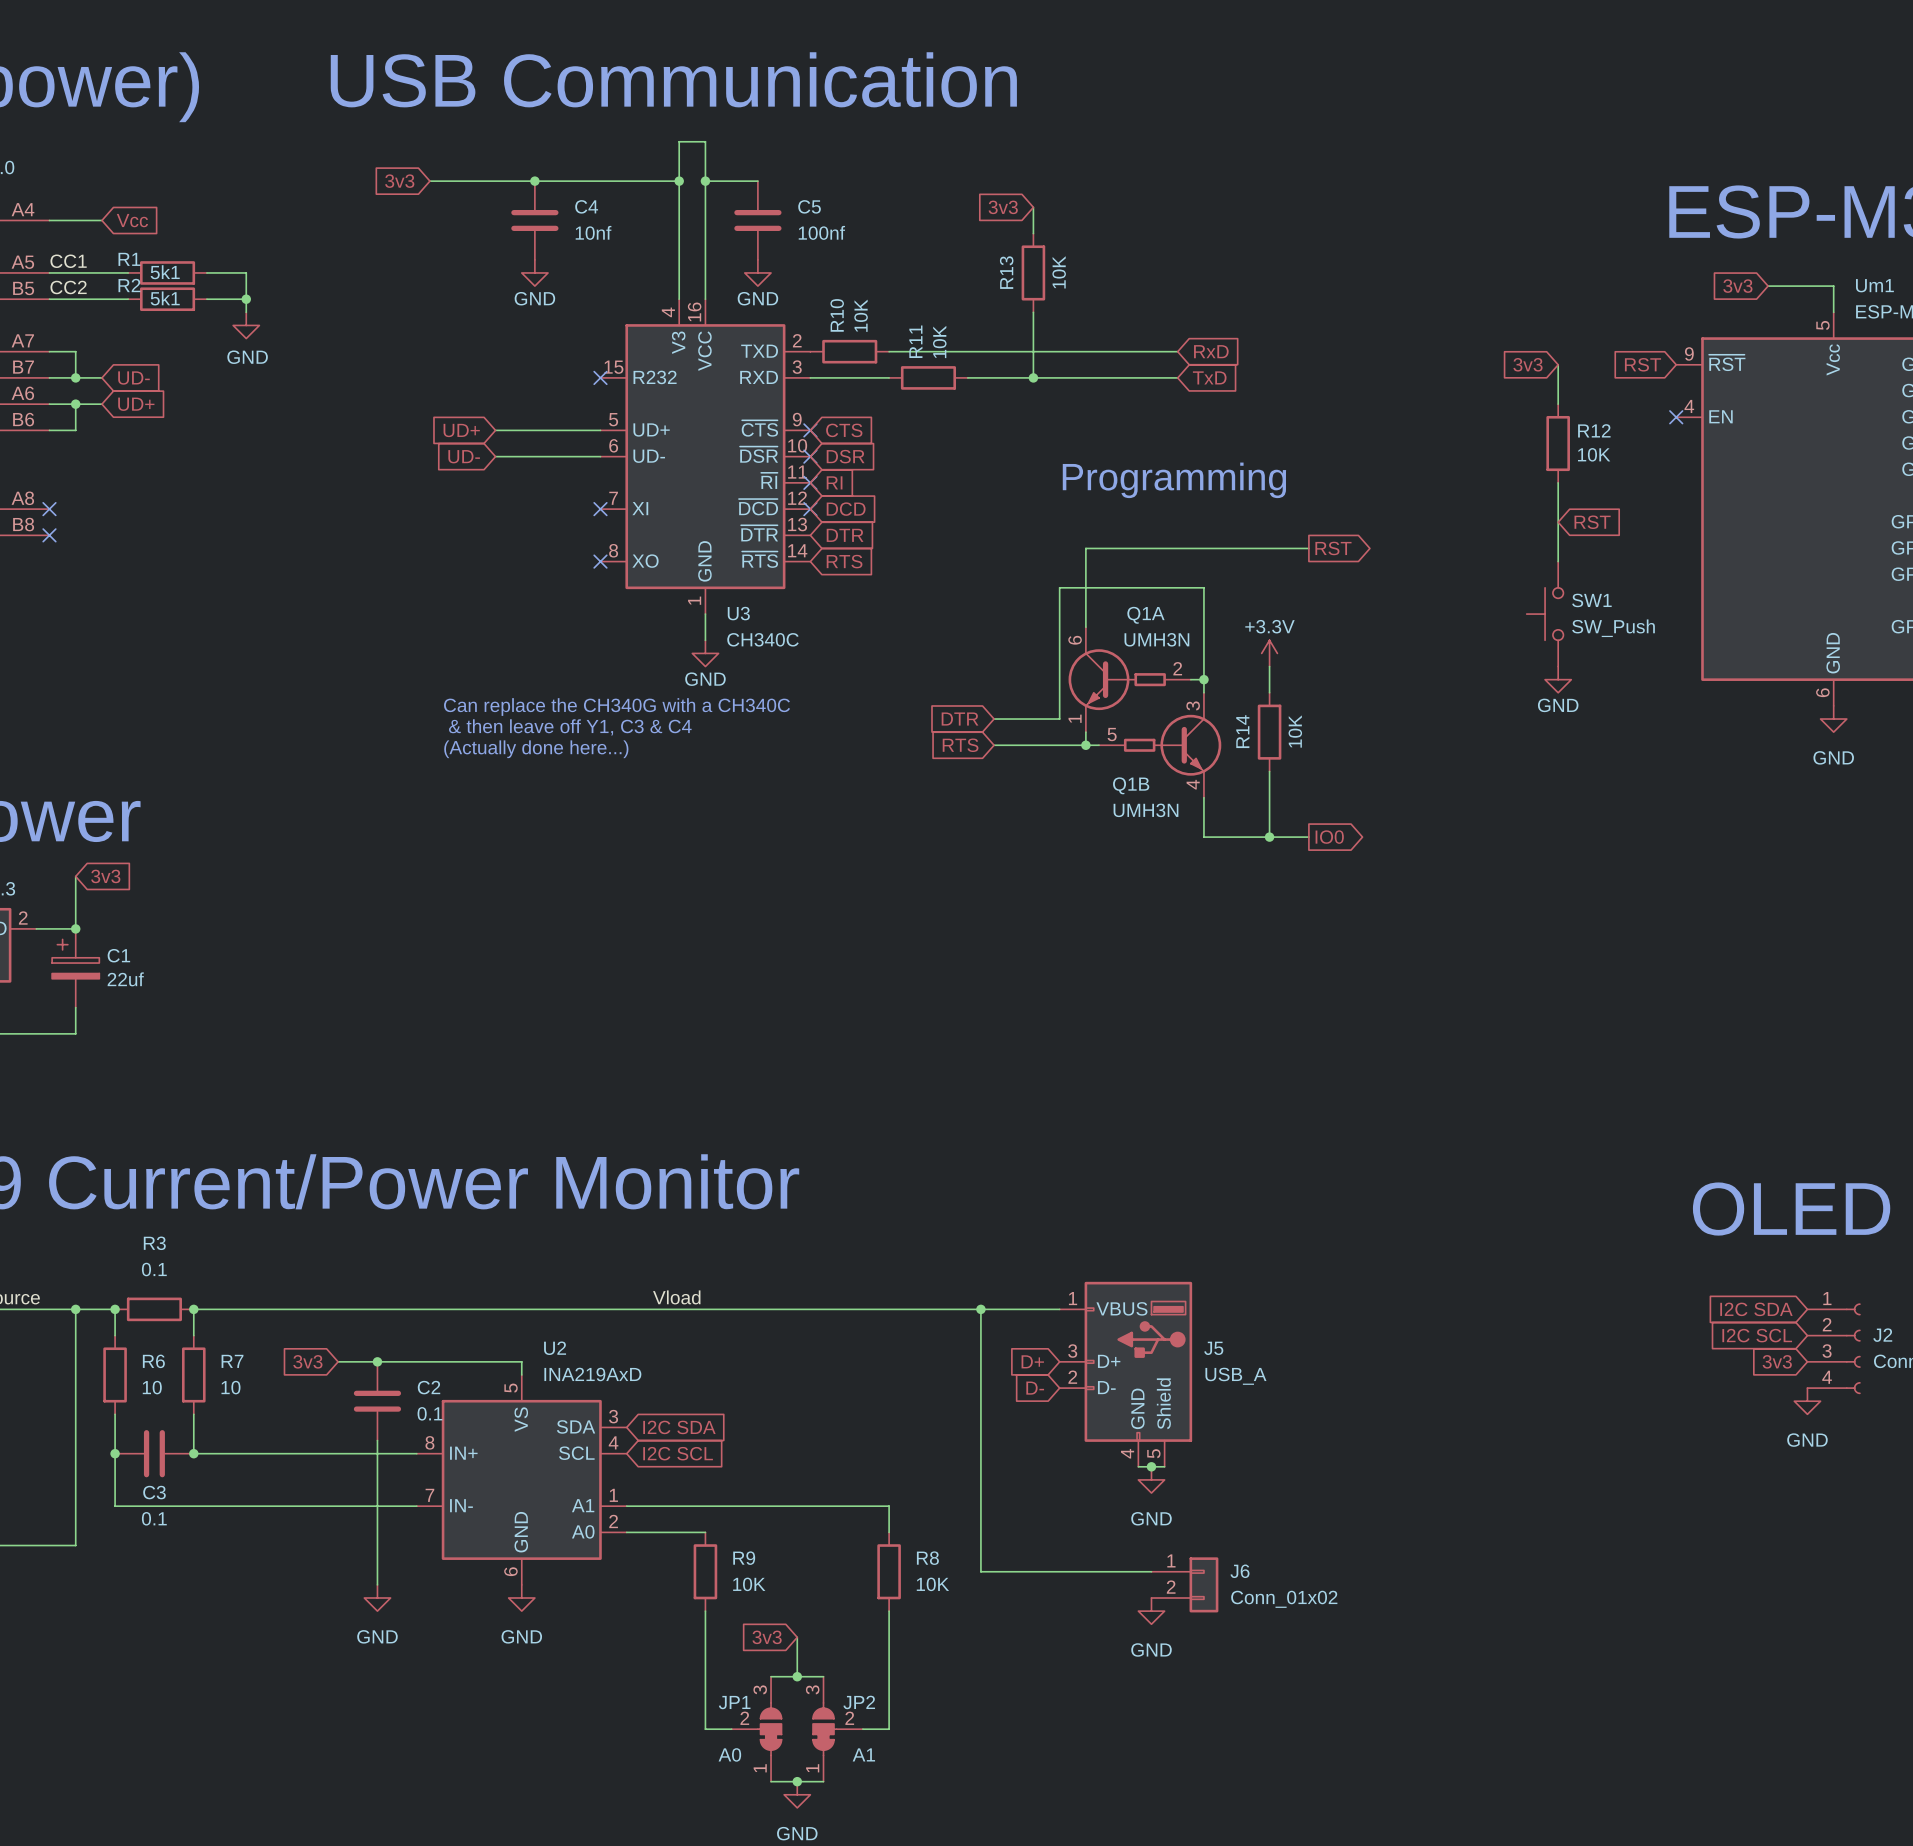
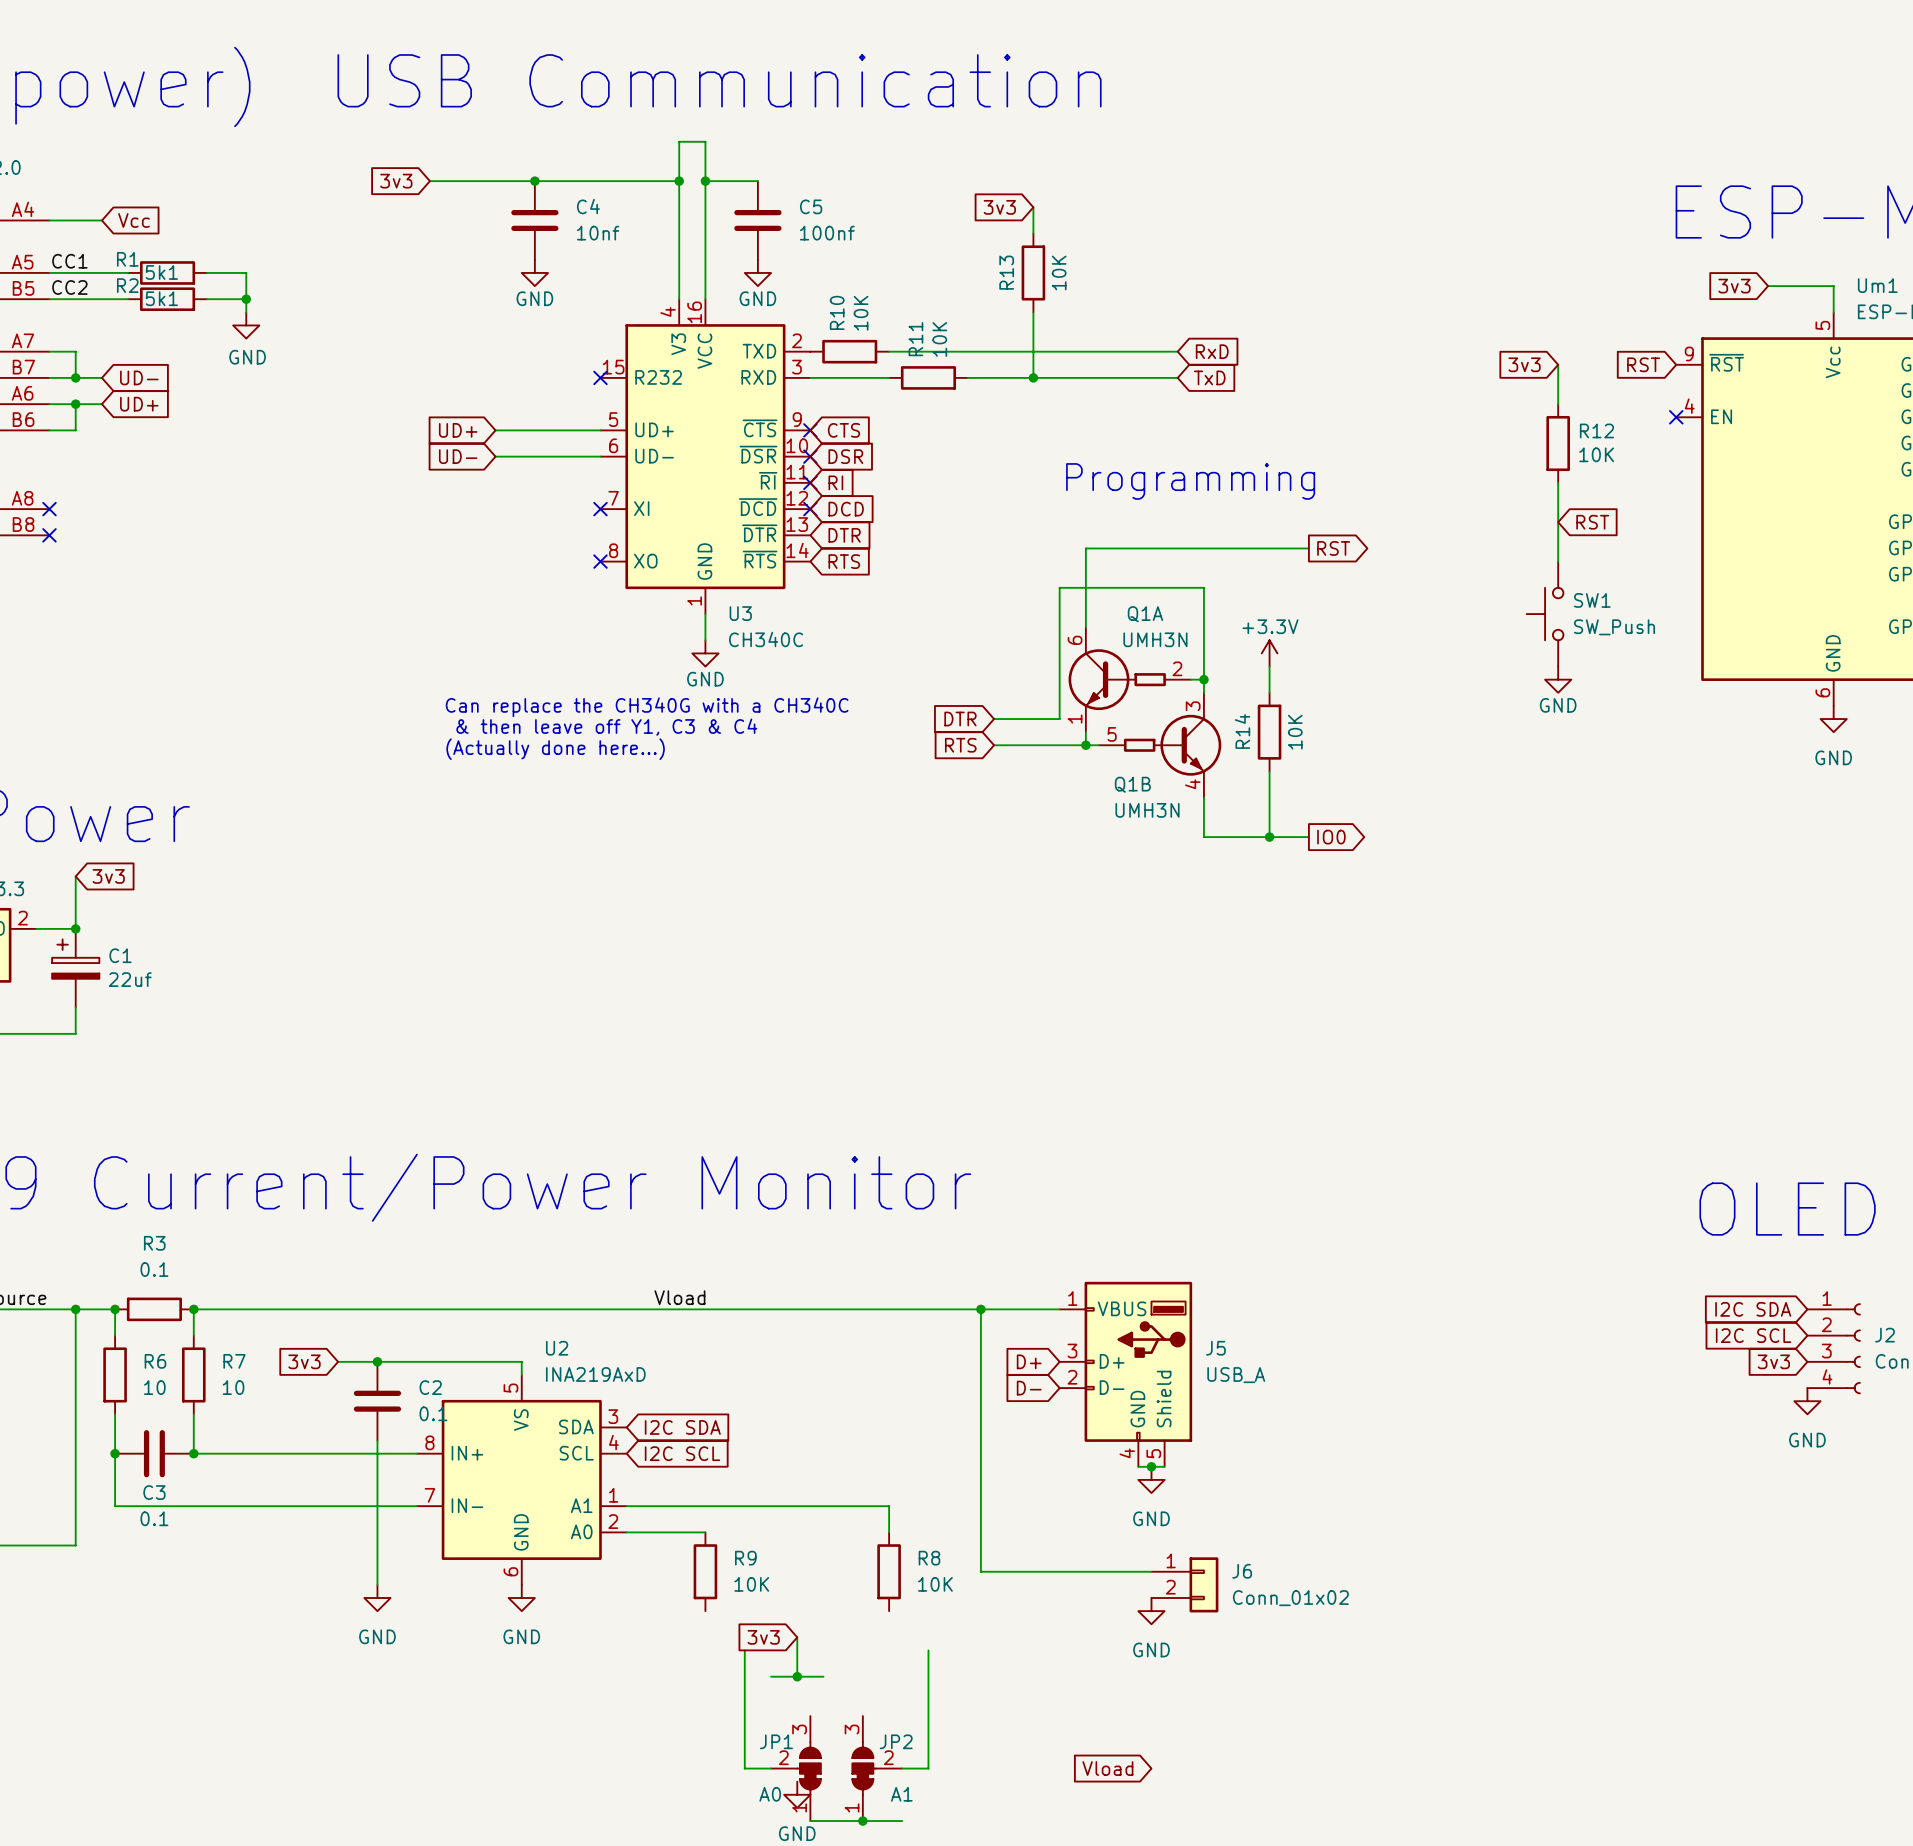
wire: (705, 1611) (705, 1729) (731, 1729) -> (744, 1650) (744, 1768) (771, 1768)
wire: (889, 1611) (889, 1729) (862, 1729) -> (928, 1650) (928, 1768) (902, 1768)
JP1 position: (756, 1729) -> (795, 1768)
JP2 position: (837, 1729) -> (877, 1768)
global label: none -> Vload (1107, 1768)
wire: (771, 1781) (823, 1781) -> none
junction: (797, 1781) -> none
wire: none -> (810, 1821) (902, 1821)
junction: none -> (862, 1821)

